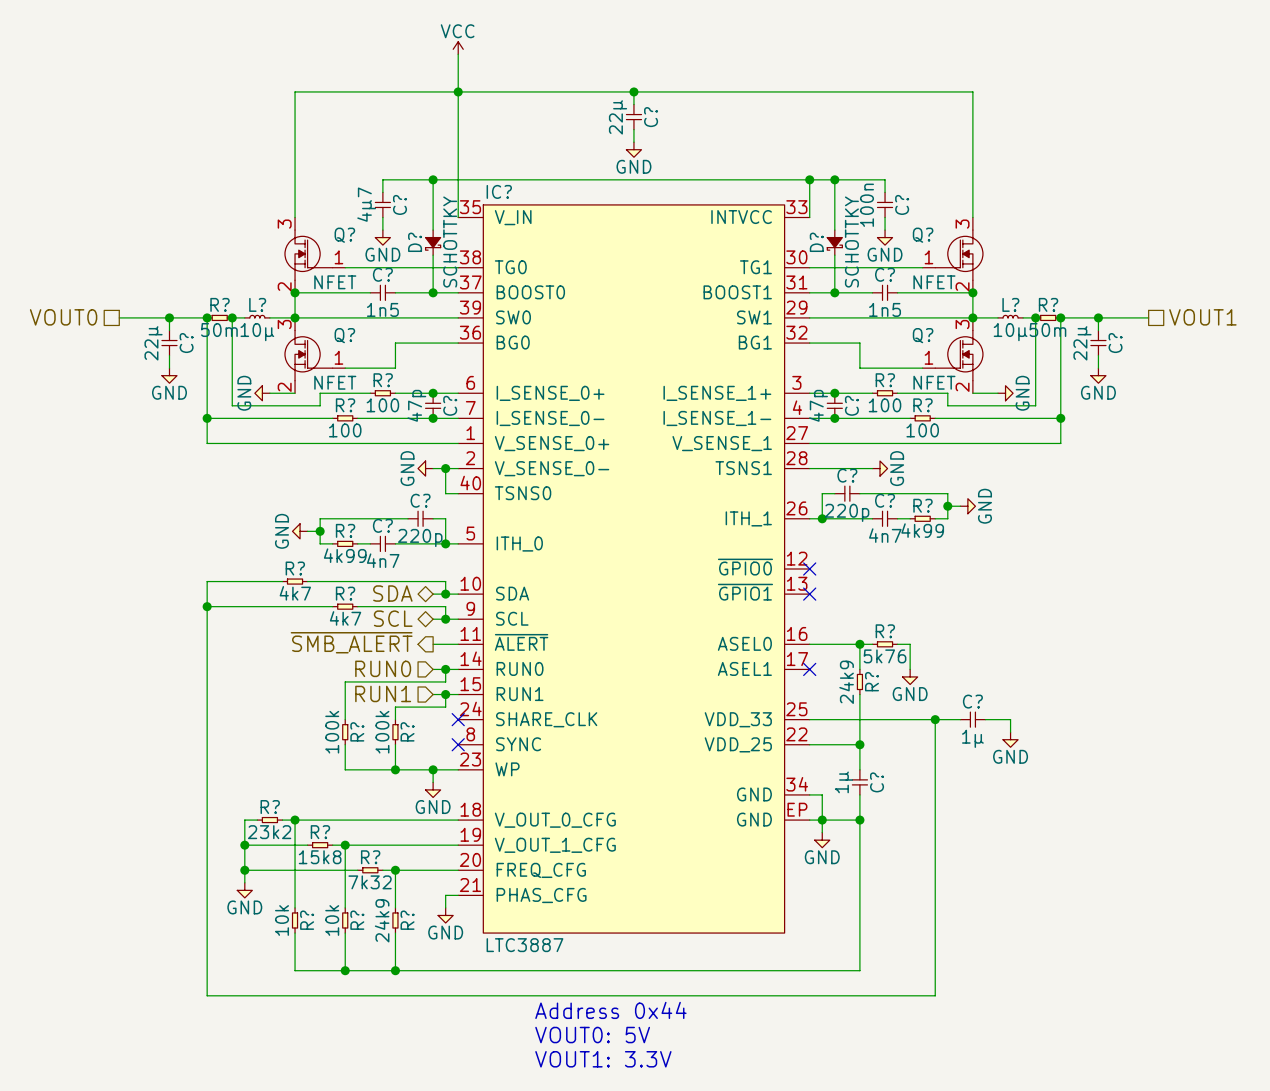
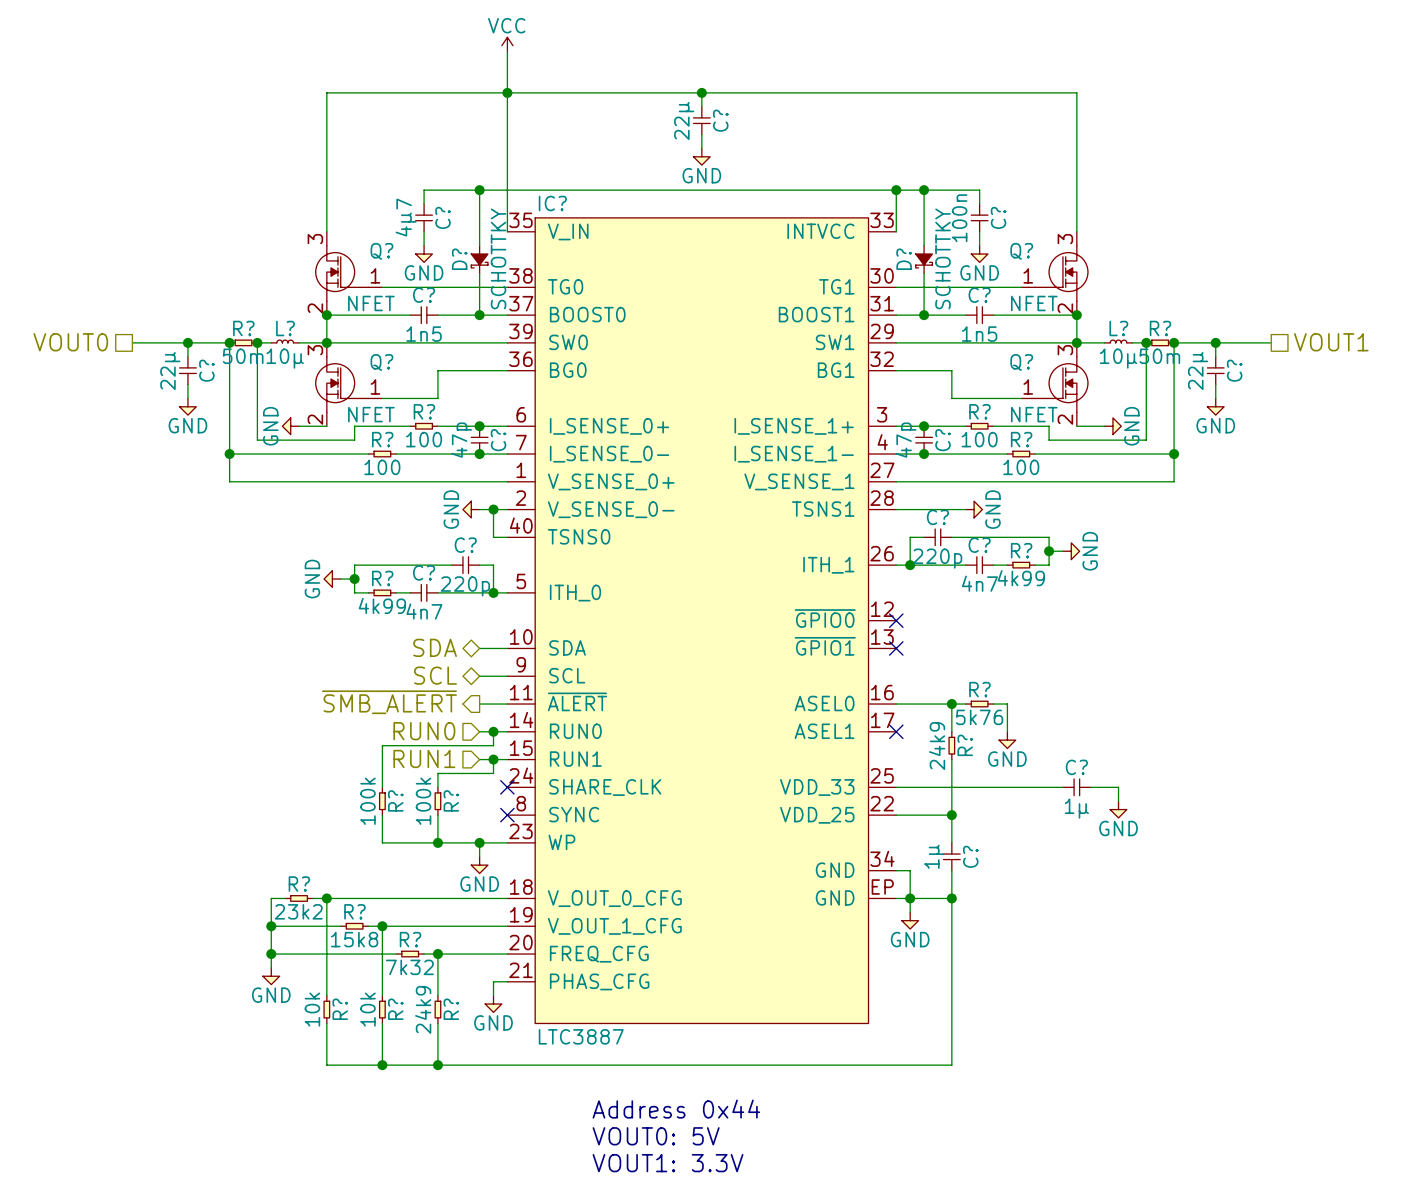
wire: (282, 581) (207, 581) (207, 995) (935, 995) (935, 719) -> none
R?: 4k7 (295, 581) -> none
wire: (307, 581) (445, 581) (445, 594) -> none
junction: (445, 594) -> none
wire: (207, 606) (332, 606) -> none
junction: (207, 606) -> none
R?: 4k7 (345, 606) -> none
wire: (357, 606) (445, 606) (445, 619) -> none
junction: (445, 619) -> none
junction: (935, 719) -> none

